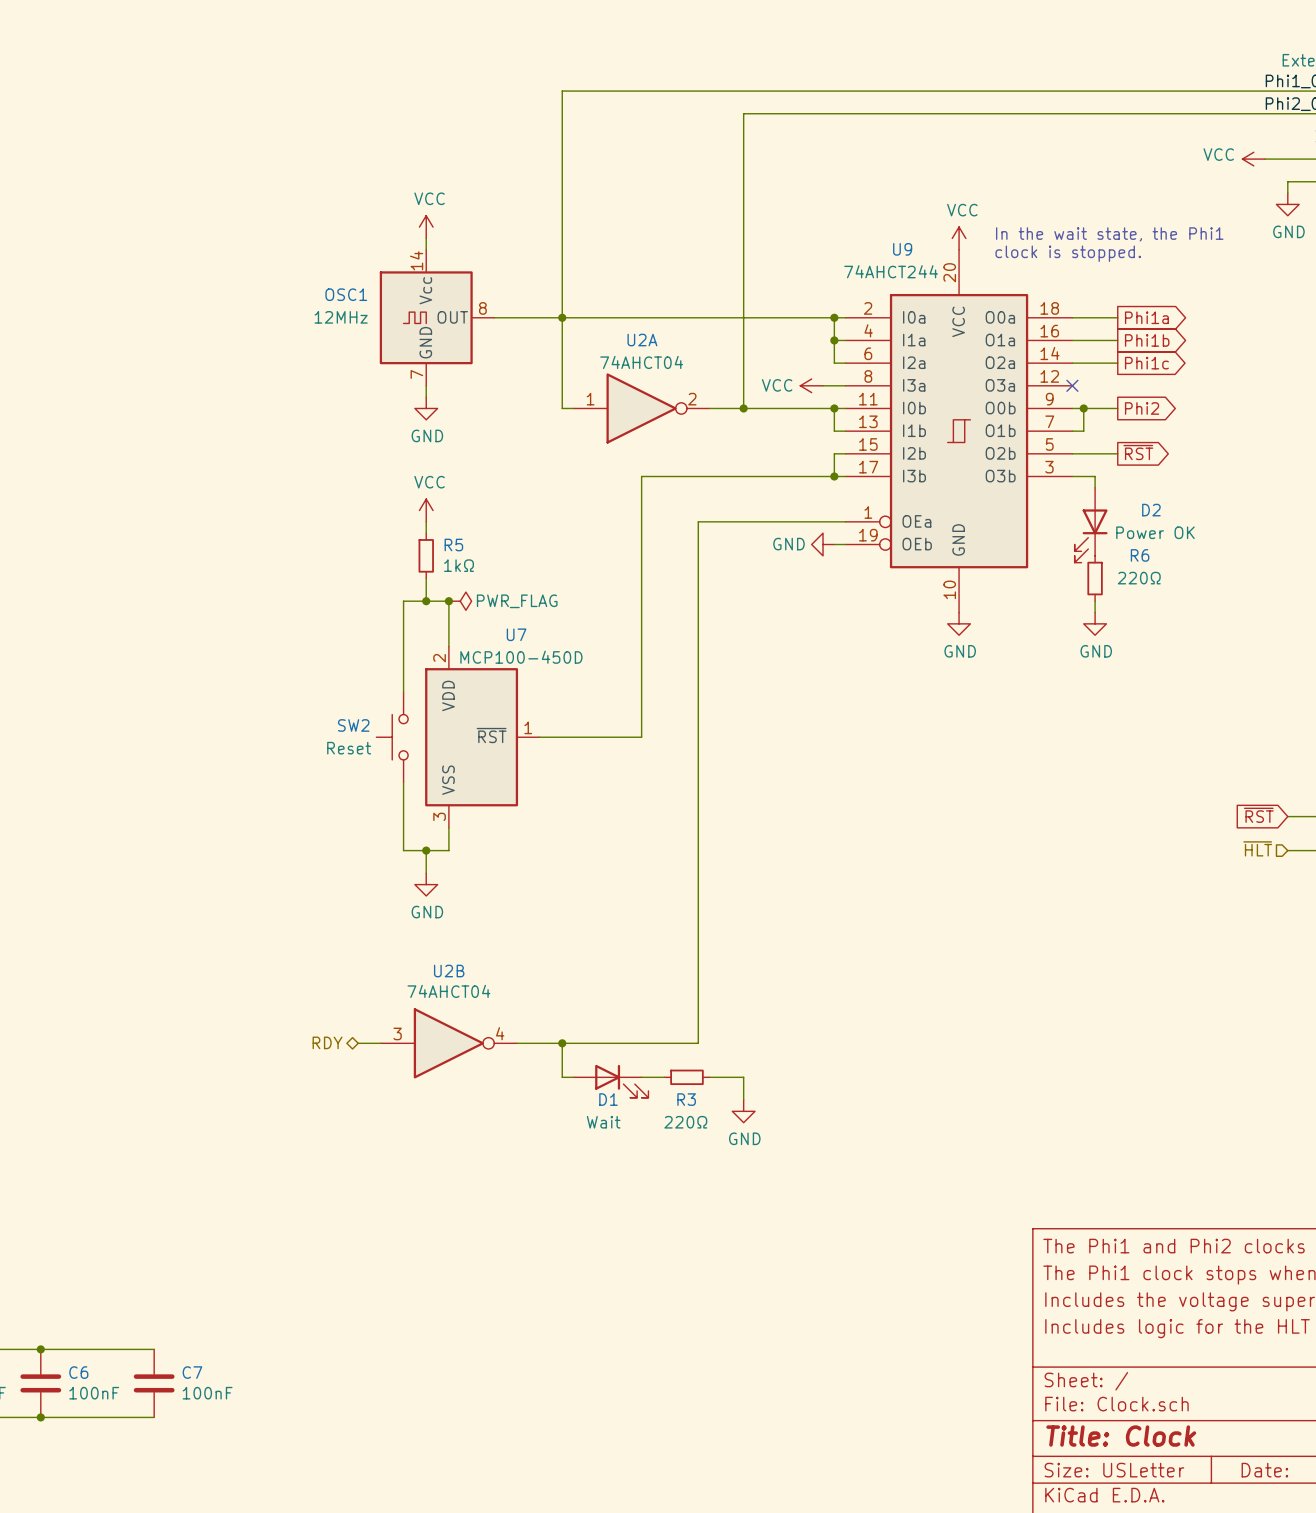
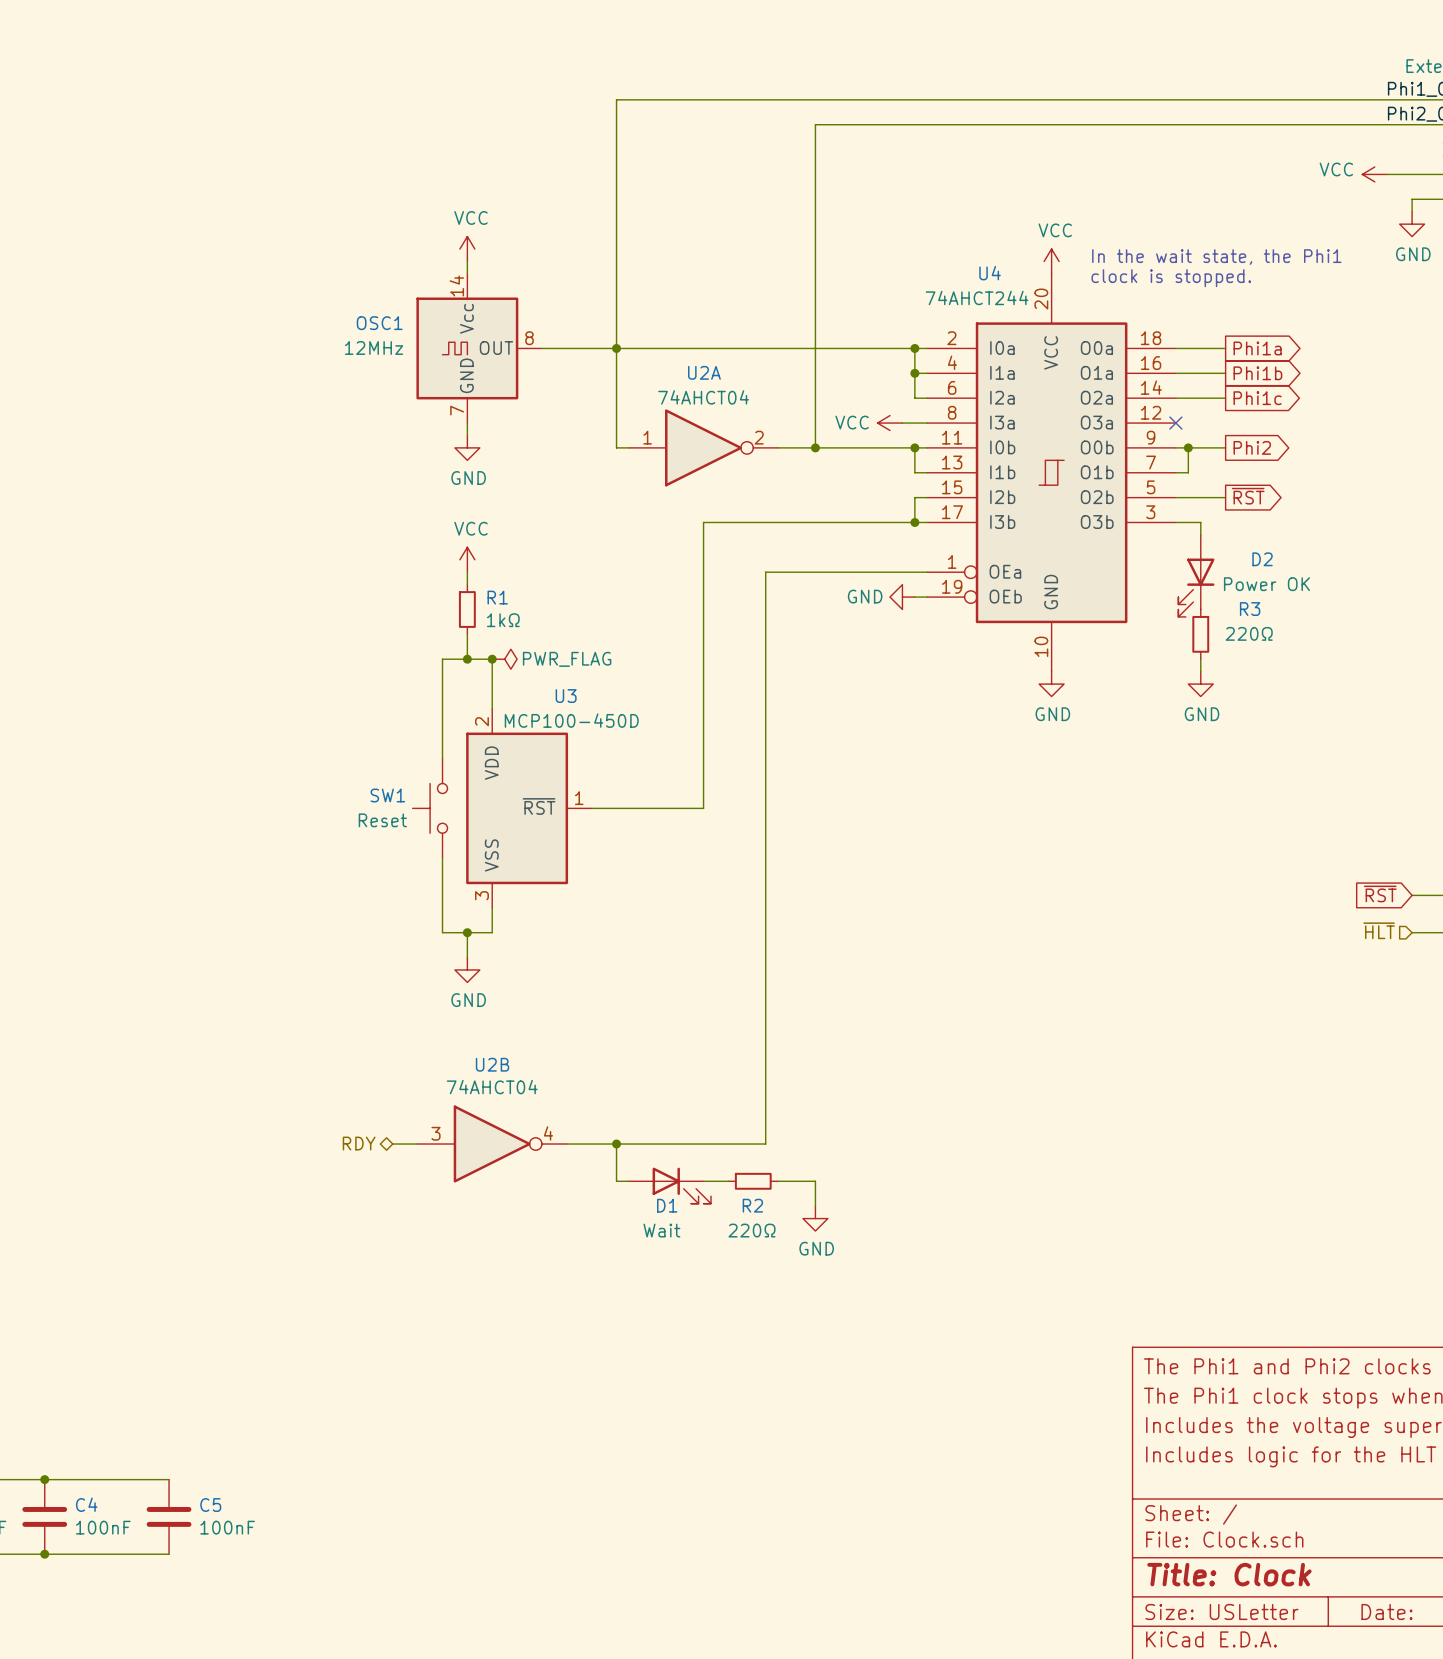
U9 name: U9 (902, 249) -> U4 (990, 273)
R5 name: R5 (453, 545) -> R1 (497, 597)
R6 name: R6 (1140, 555) -> R3 (1250, 609)
U7 name: U7 (516, 634) -> U3 (566, 696)
SW2 name: SW2 (353, 725) -> SW1 (387, 795)
R3 name: R3 (686, 1099) -> R2 (752, 1205)
C6 name: C6 (78, 1372) -> C4 (86, 1504)
C7 name: C7 (192, 1372) -> C5 (210, 1505)

